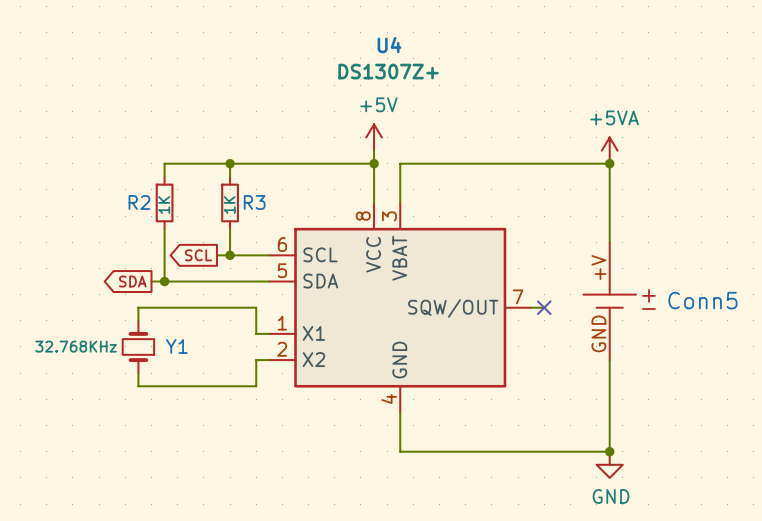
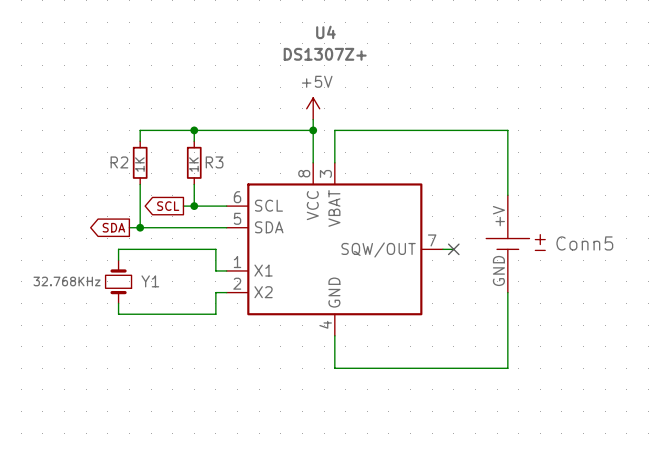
power symbol: +5VA (609, 150) -> none
junction: (609, 163) -> none
junction: (609, 451) -> none
power symbol: GND (609, 464) -> none

